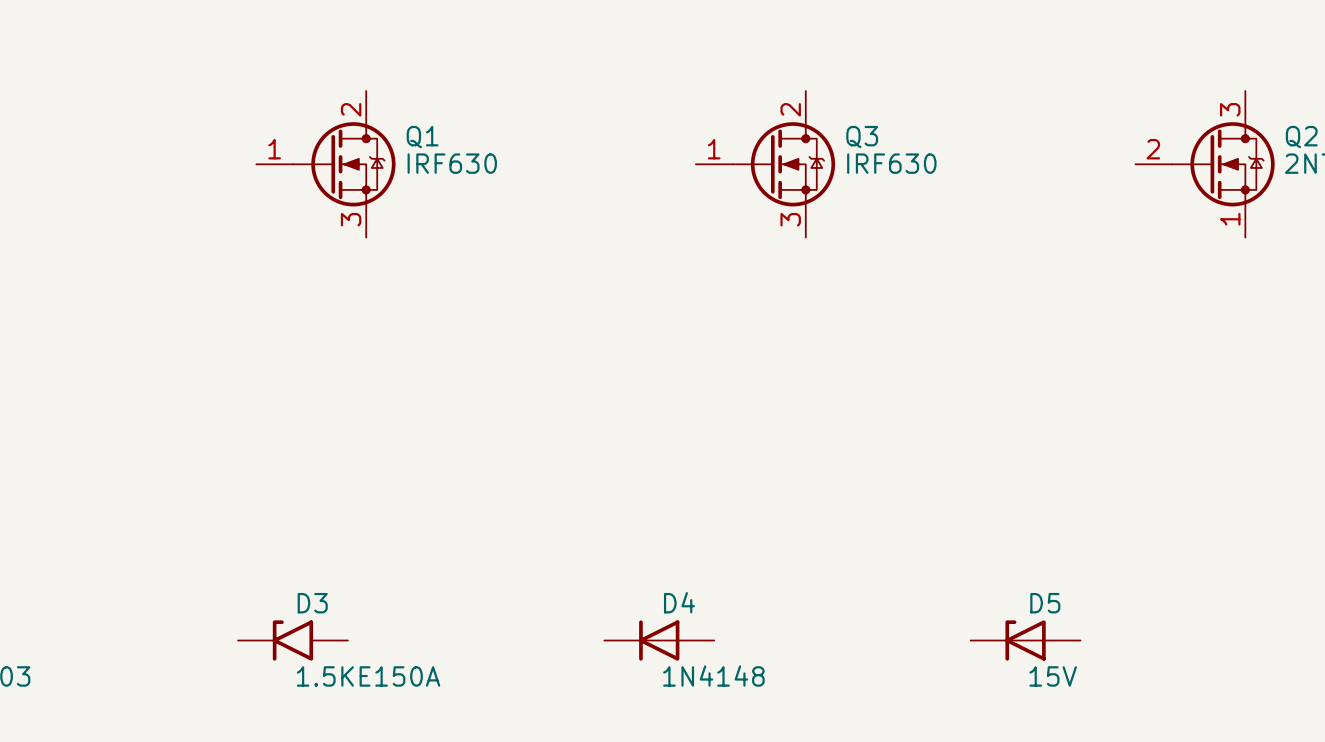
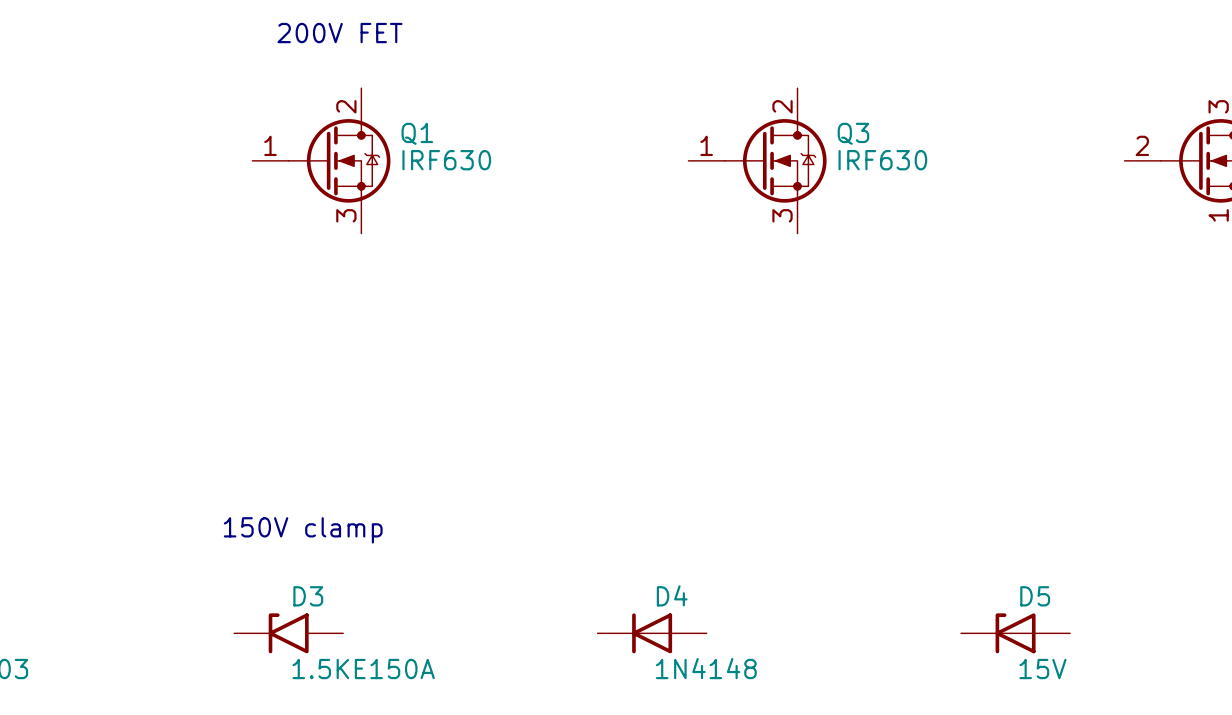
text: none -> 200V FET (339, 33)
text: none -> 150V clamp (303, 530)

